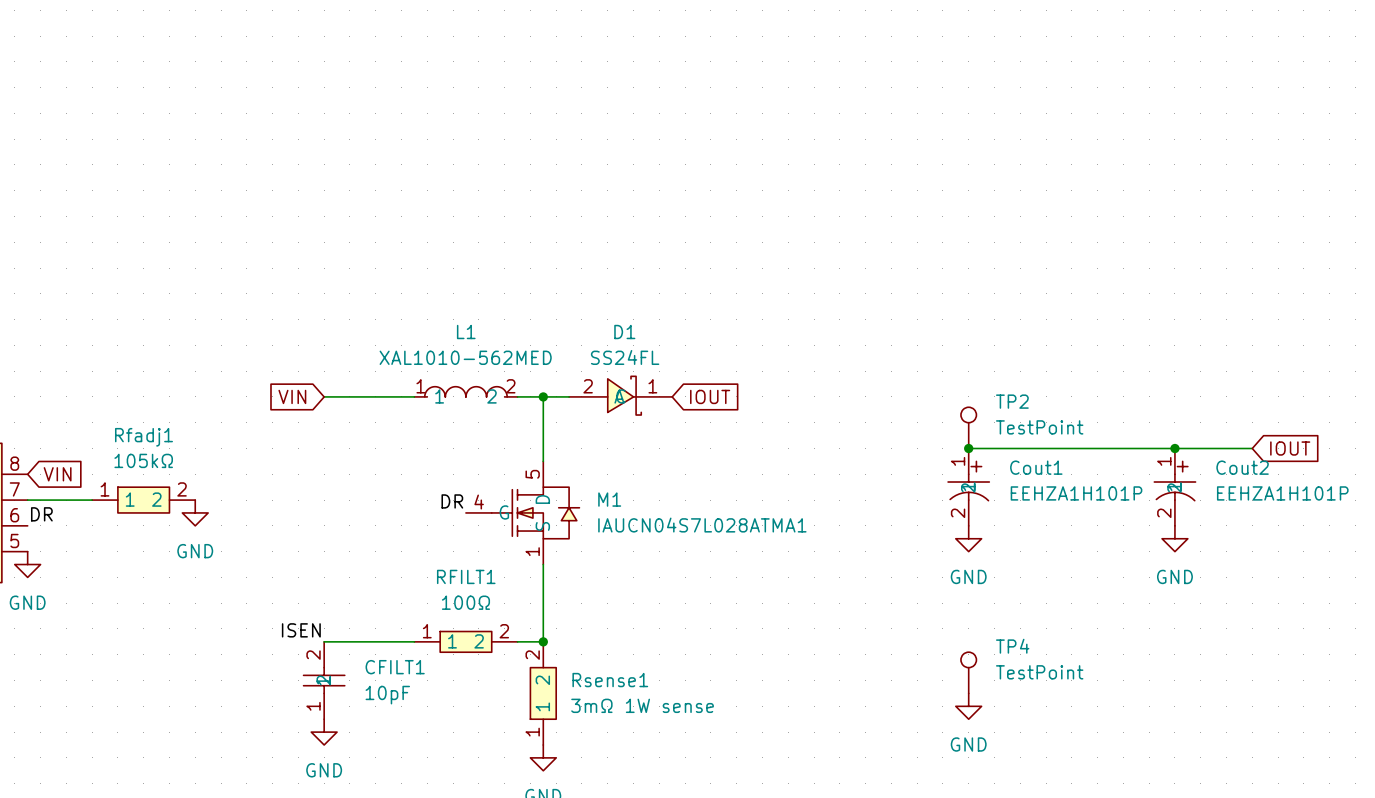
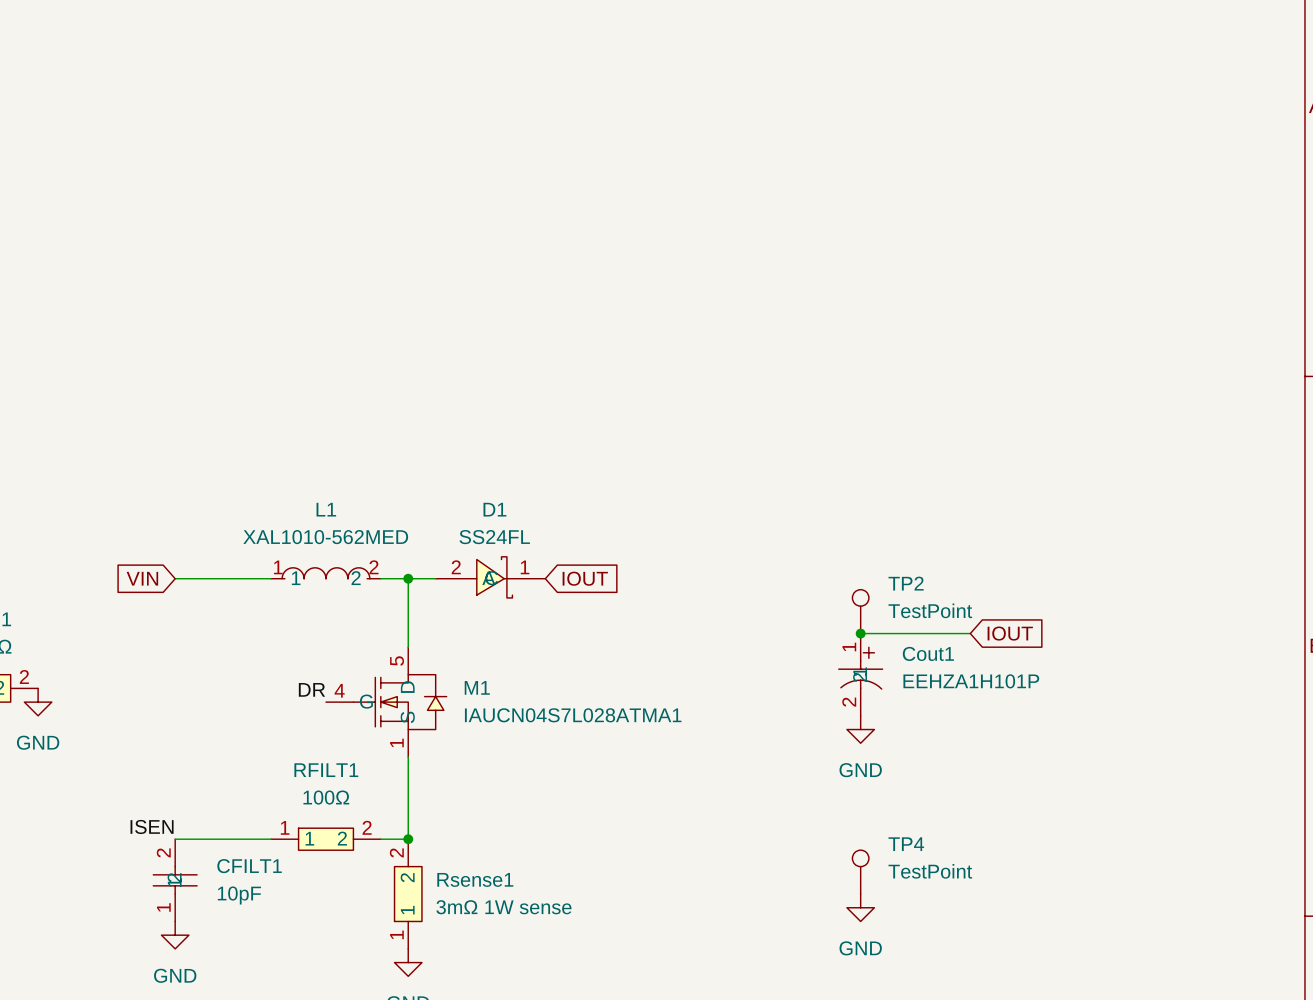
wire: (1071, 448) (1252, 448) -> none
junction: (1174, 448) -> none
global label position: IOUT (1290, 448) -> IOUT (1010, 633)
Cout2: EEHZA1H101P (1174, 487) -> none
power symbol: GND (1174, 538) -> none

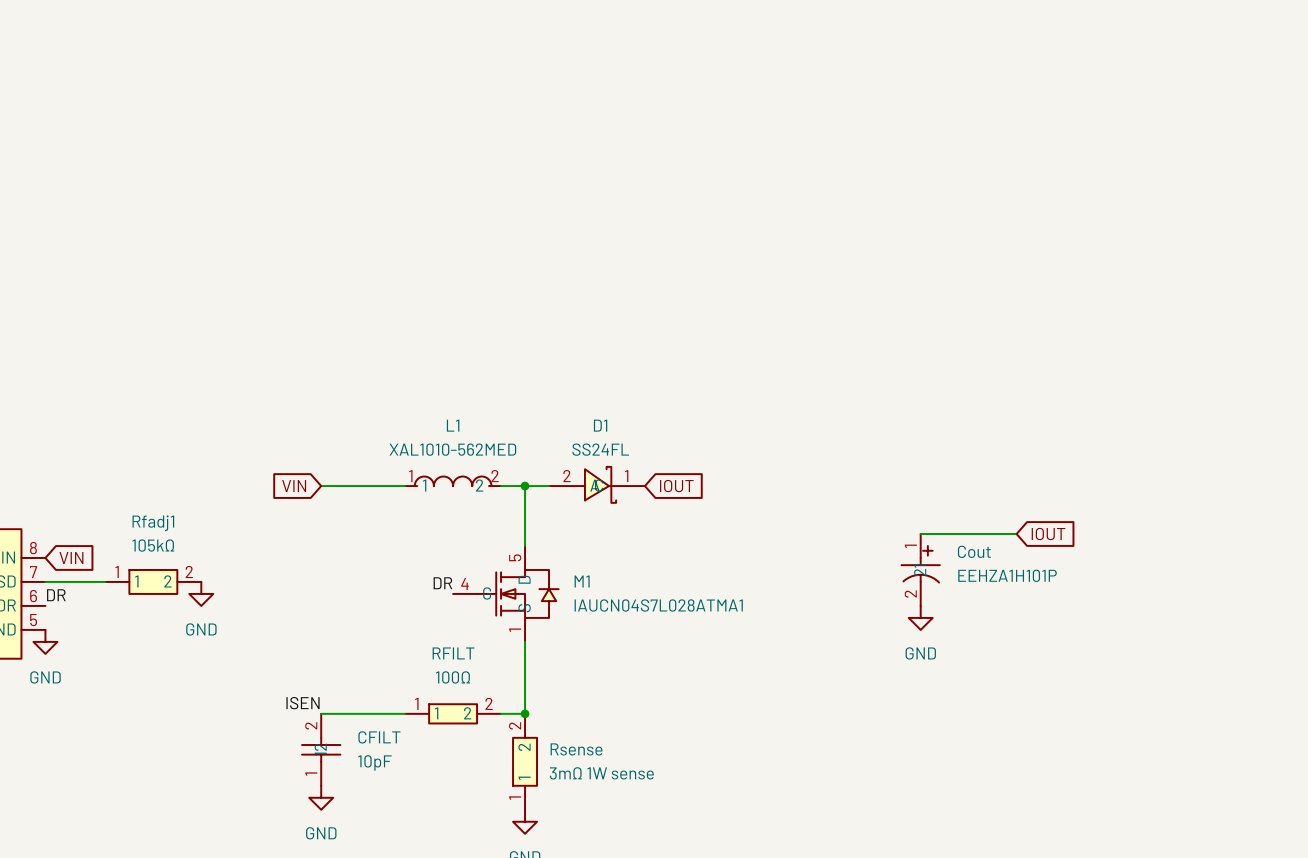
TP2: TestPoint (860, 611) -> none
junction: (860, 633) -> none
Cout1 name: Cout1 (928, 653) -> Cout (974, 551)
RFILT1 name: RFILT1 (326, 770) -> RFILT (453, 653)
CFILT1 name: CFILT1 (249, 866) -> CFILT (379, 737)
TP4: TestPoint (860, 872) -> none
Rsense1 name: Rsense1 (475, 879) -> Rsense (576, 749)
power symbol: GND (860, 907) -> none

